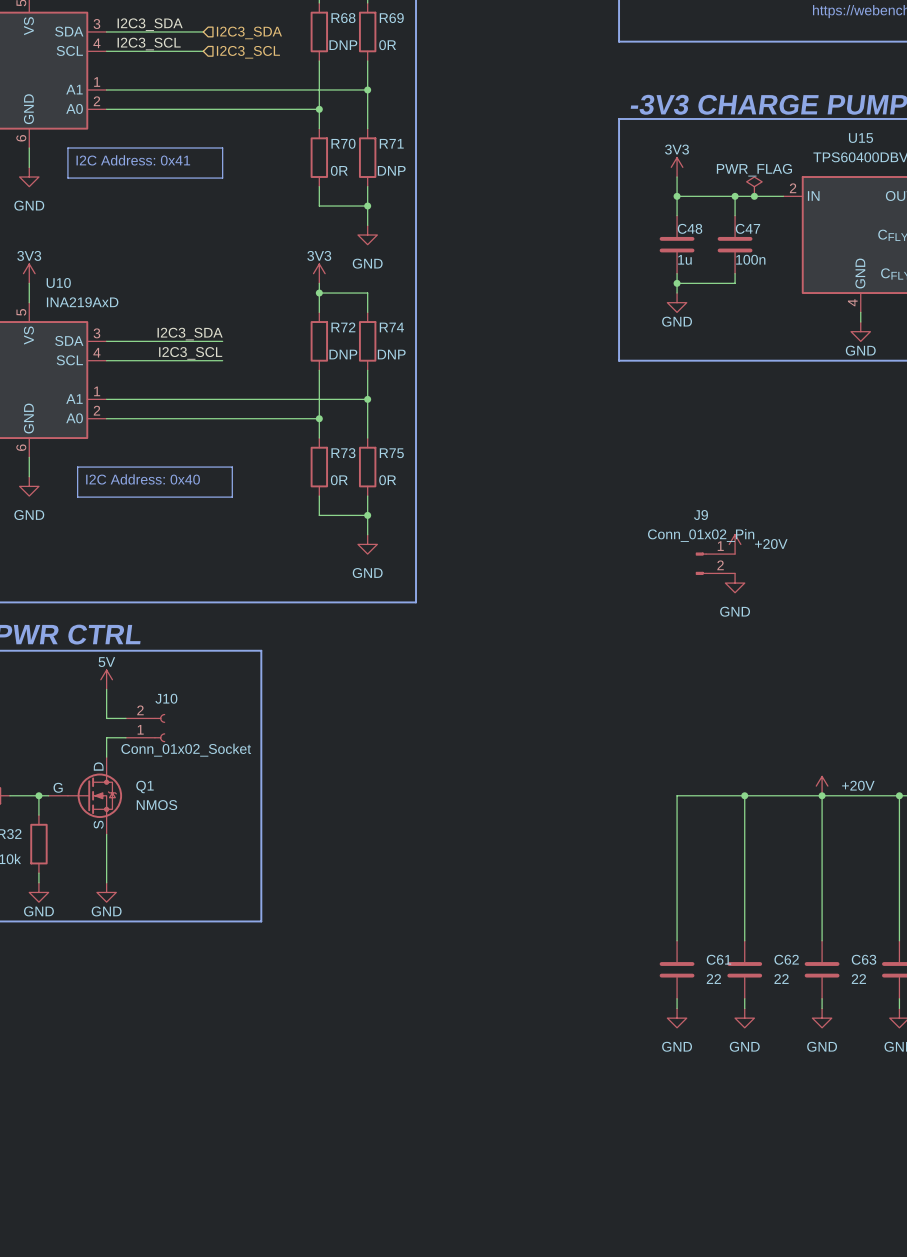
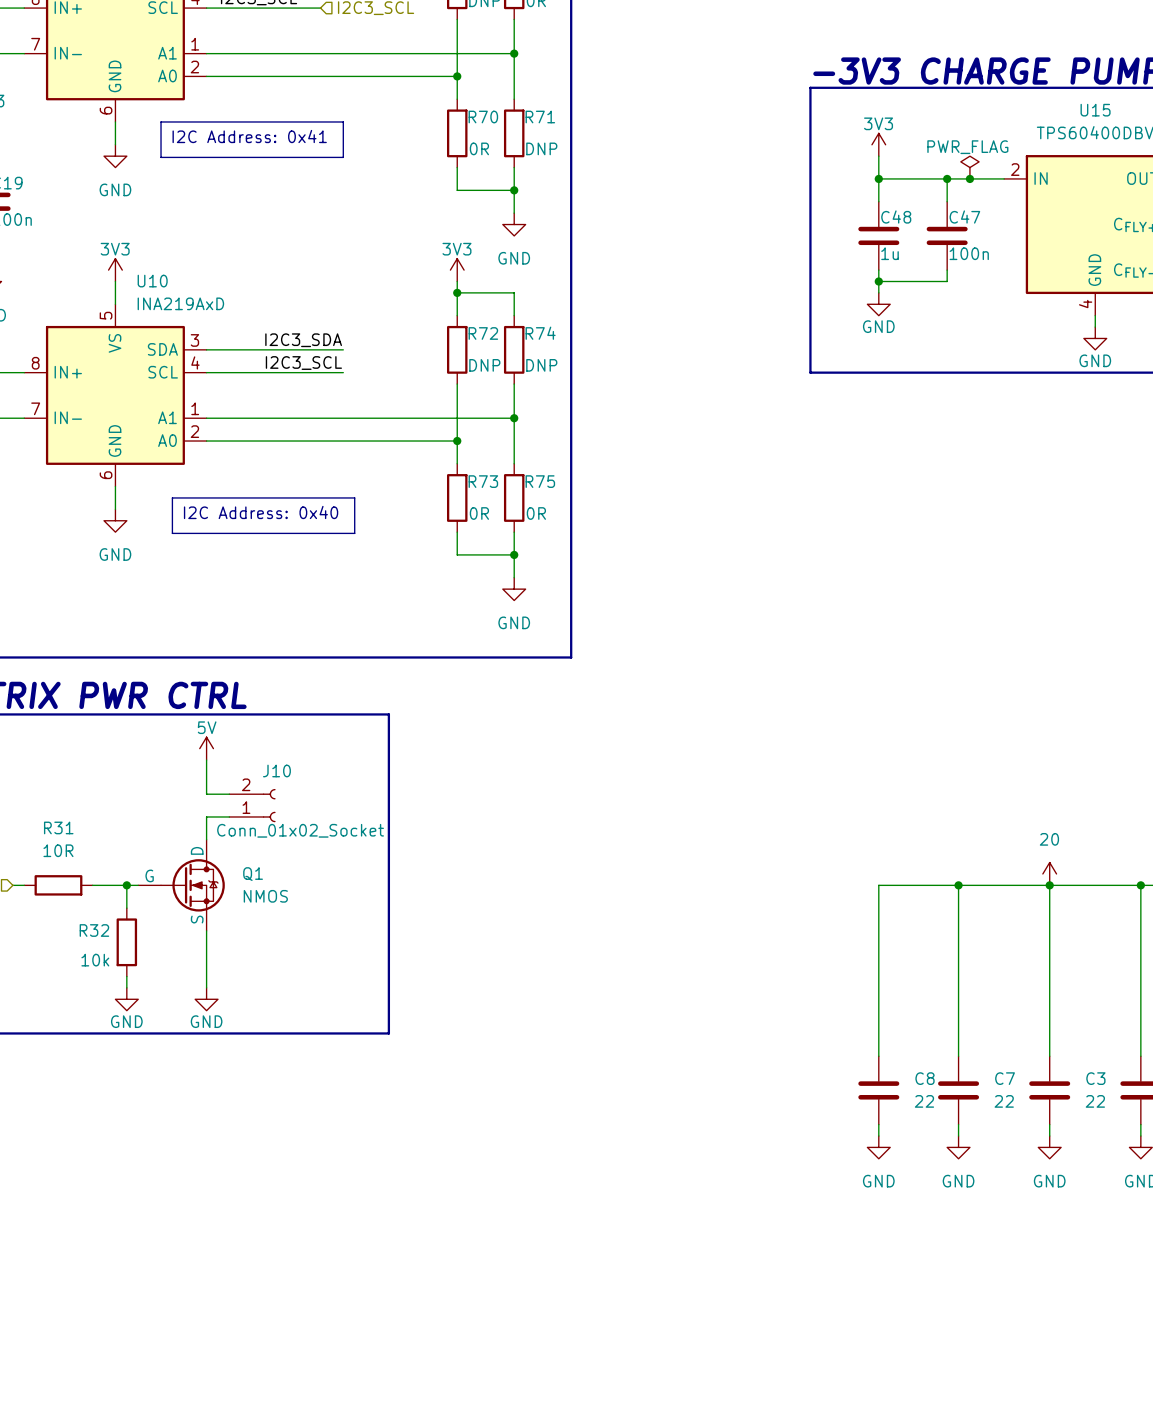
power symbol: +20V (735, 544) -> none
J9: Conn_01x02_Pin (715, 563) -> none
power symbol: GND (735, 583) -> none
power symbol: +20V (822, 786) -> 20 (1049, 873)
C61 name: C61 (718, 959) -> C8 (925, 1078)
C62 name: C62 (786, 959) -> C7 (1005, 1078)
C63 name: C63 (864, 959) -> C3 (1095, 1078)

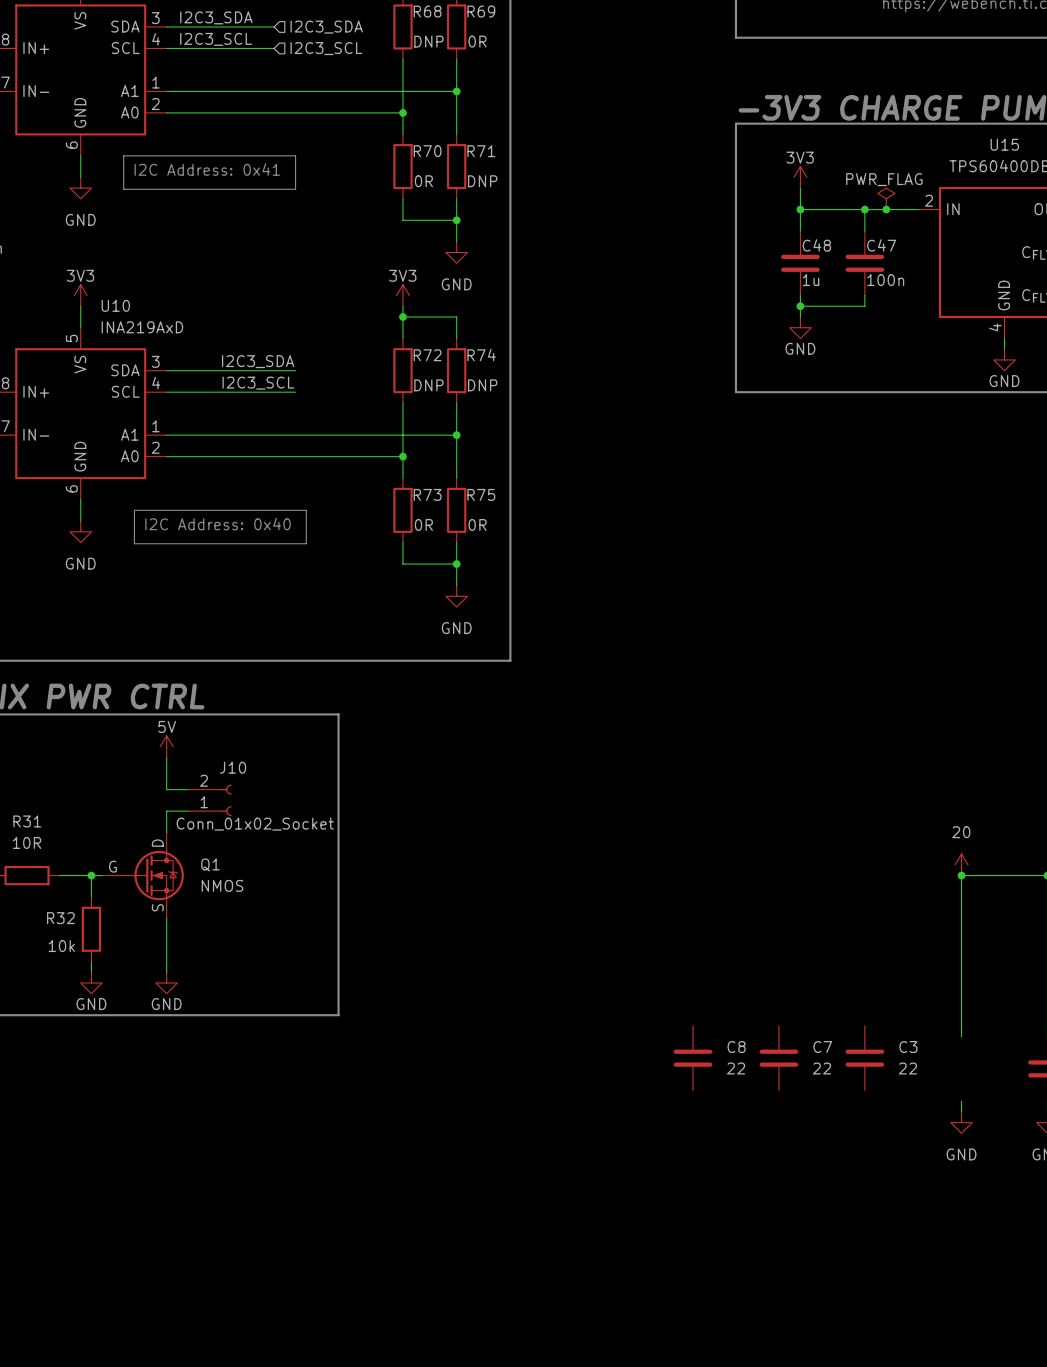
wire: (958, 885) (958, 1056) -> none
junction: (958, 885) -> none
wire: (1049, 885) (878, 885) (878, 1056) -> none
C8 position: (878, 1090) -> (693, 1058)
C7 position: (958, 1090) -> (778, 1058)
C3 position: (1049, 1090) -> (864, 1058)
wire: (878, 1124) (878, 1136) -> none
wire: (958, 1124) (958, 1136) -> none
power symbol: GND (878, 1147) -> none
power symbol: GND (958, 1147) -> none

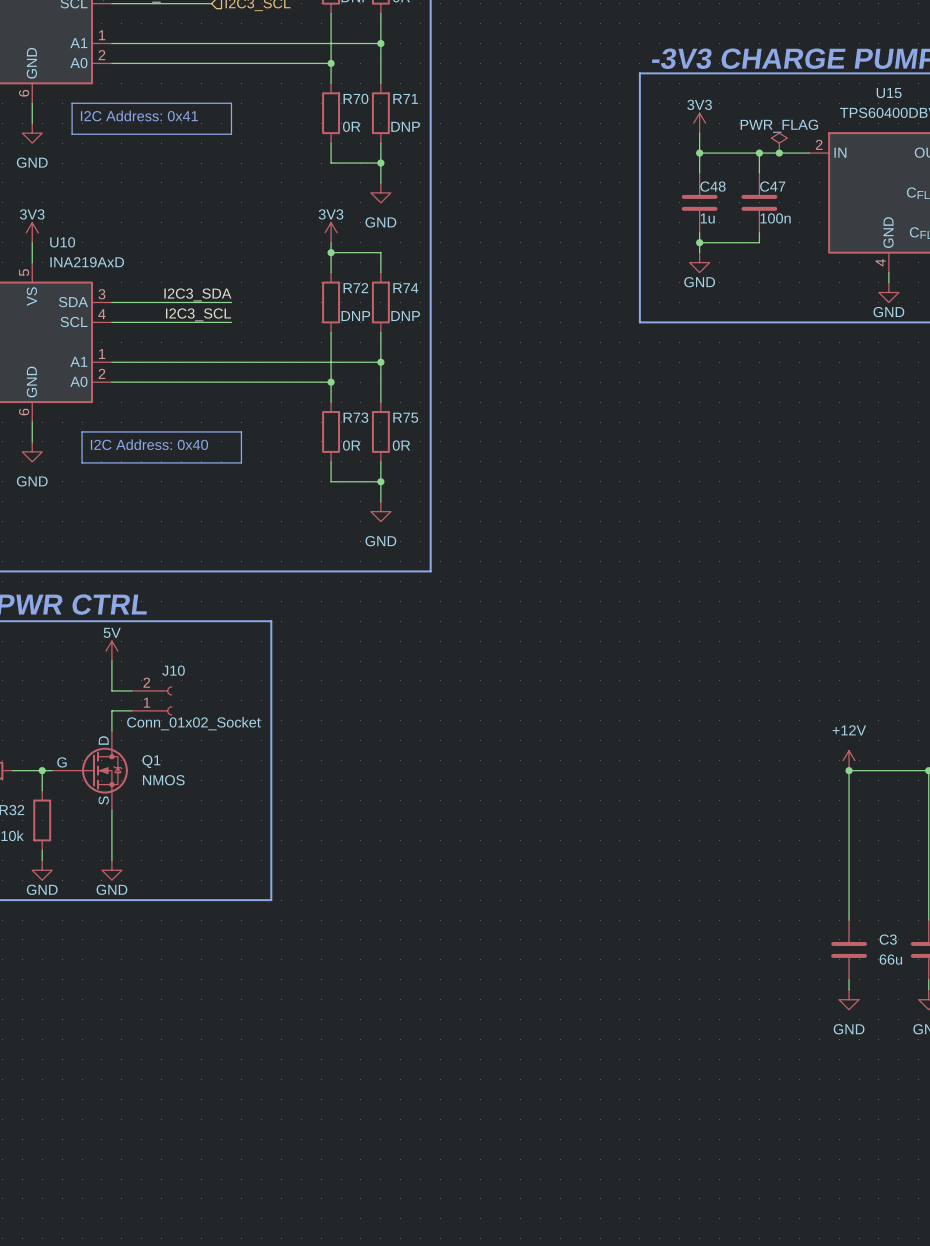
power symbol: 20 (961, 864) -> +12V (849, 760)
C8: 22 (693, 1058) -> none
C7: 22 (778, 1058) -> none
C3 position: (864, 1058) -> (849, 949)
C3 value: 22 (907, 1068) -> 66u (890, 959)

